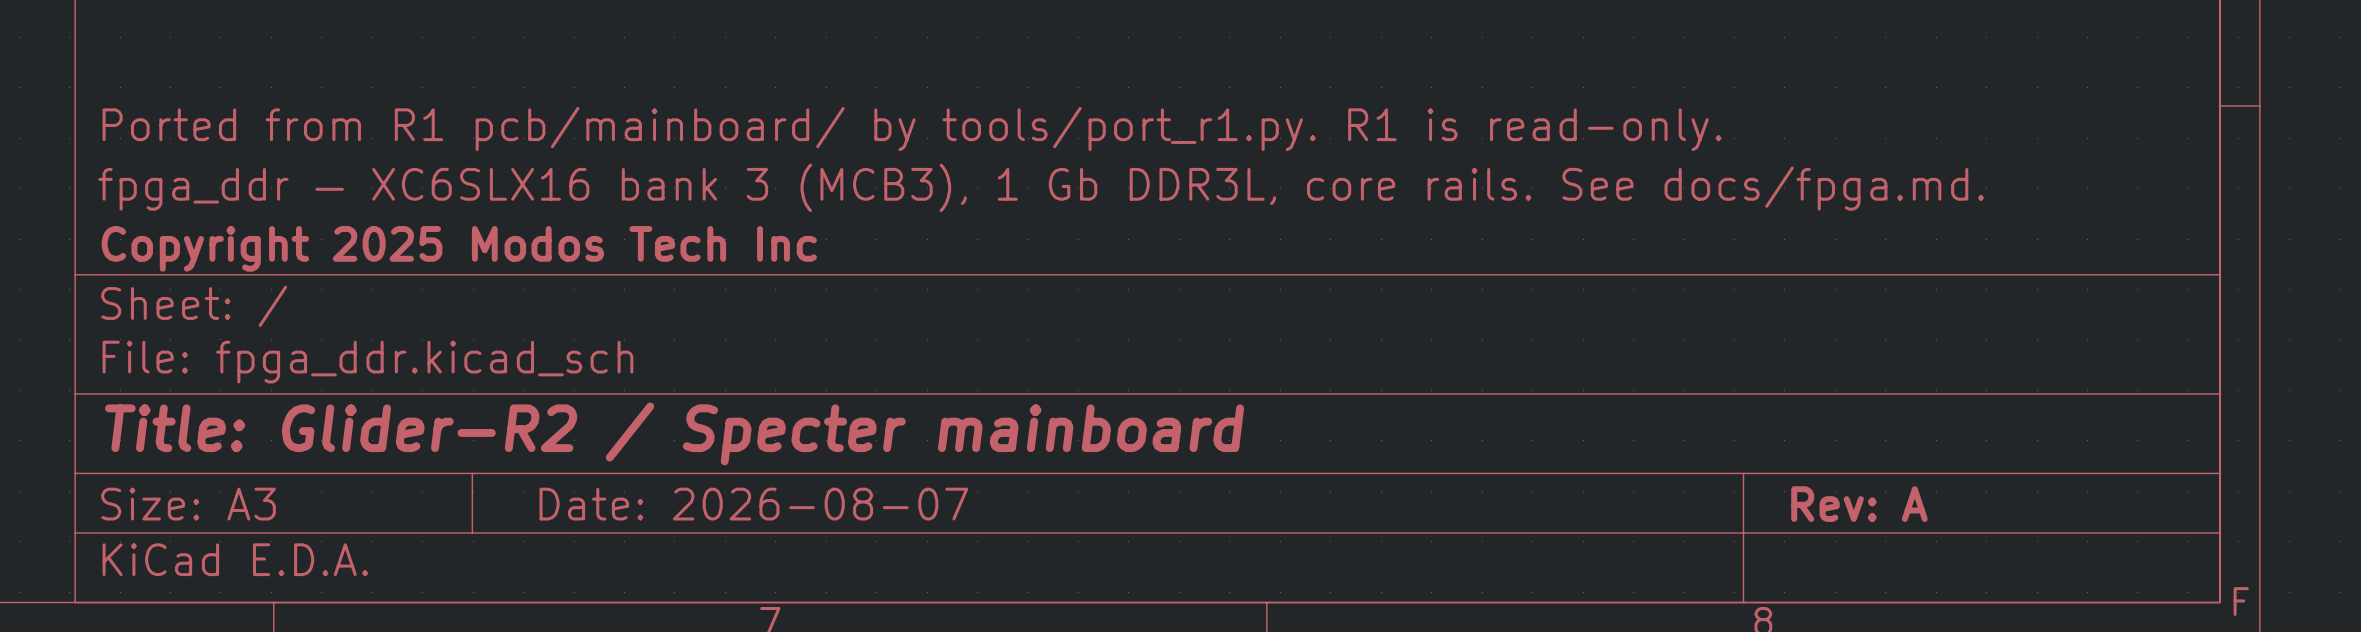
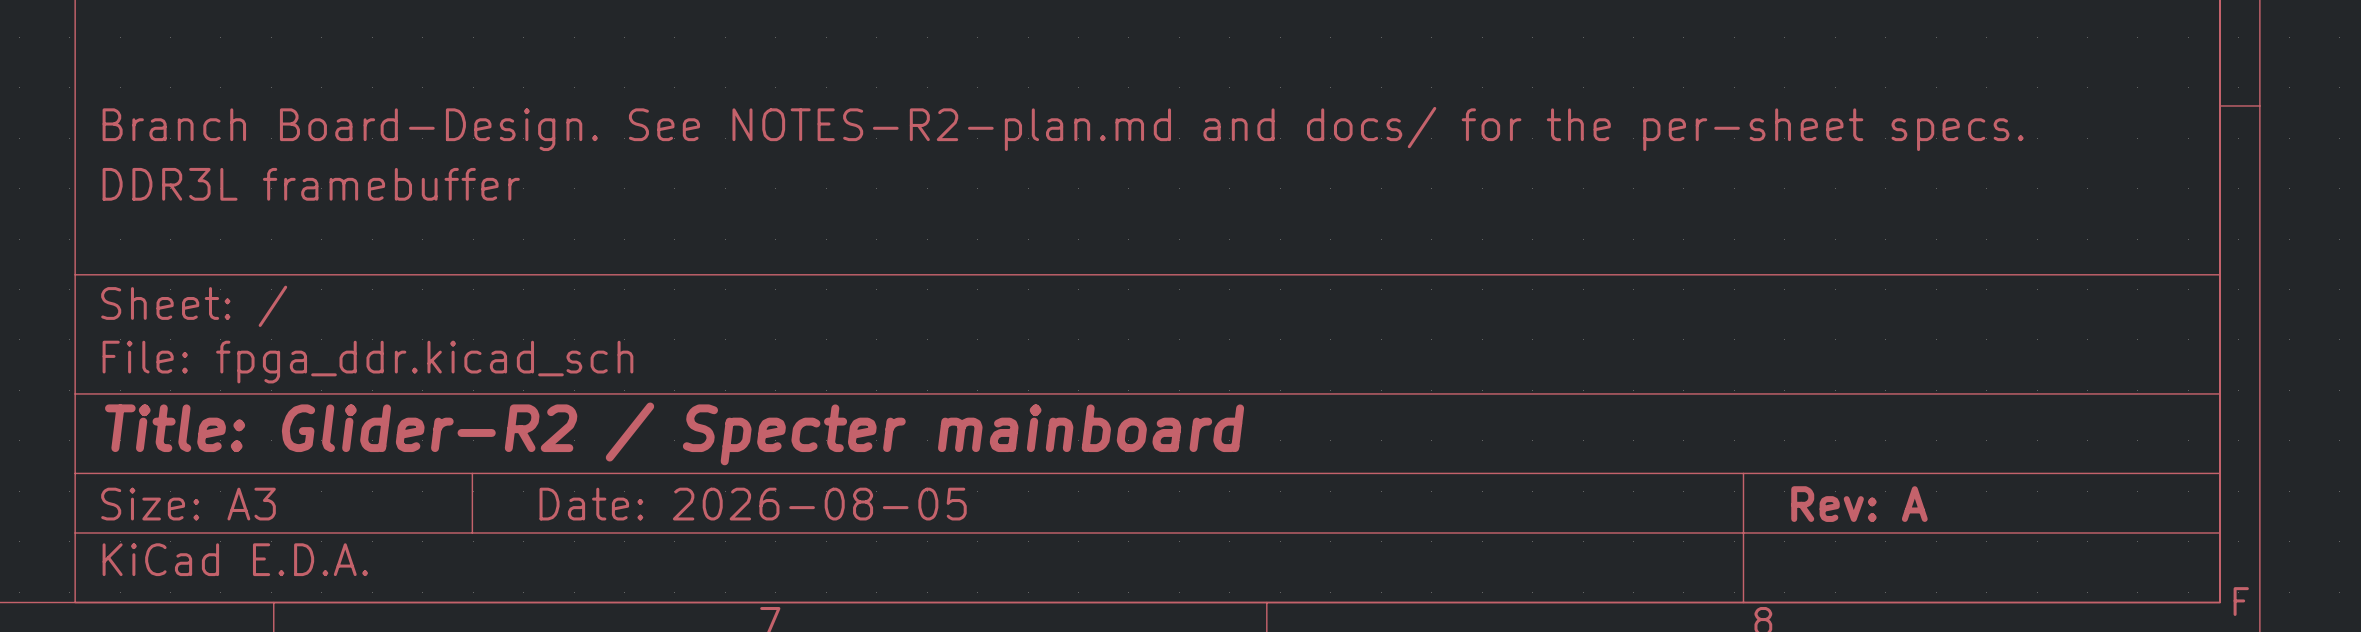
title block: Ported from R1 pcb/mainboard/ by tools/port_r1.py. R1 is read-only. (912, 128) -> Branch Board-Design. See NOTES-R2-plan.md and docs/ for the per-sheet specs. (1063, 128)
title block: fpga_ddr — XC6SLX16 bank 3 (MCB3), 1 Gb DDR3L, core rails. See docs/fpga.md. (1041, 187) -> DDR3L framebuffer (311, 184)
title block: Copyright 2025 Modos Tech Inc (459, 248) -> none
title block: Date: 2026-08-07 (753, 504) -> Date: 2026-08-05 (753, 504)

